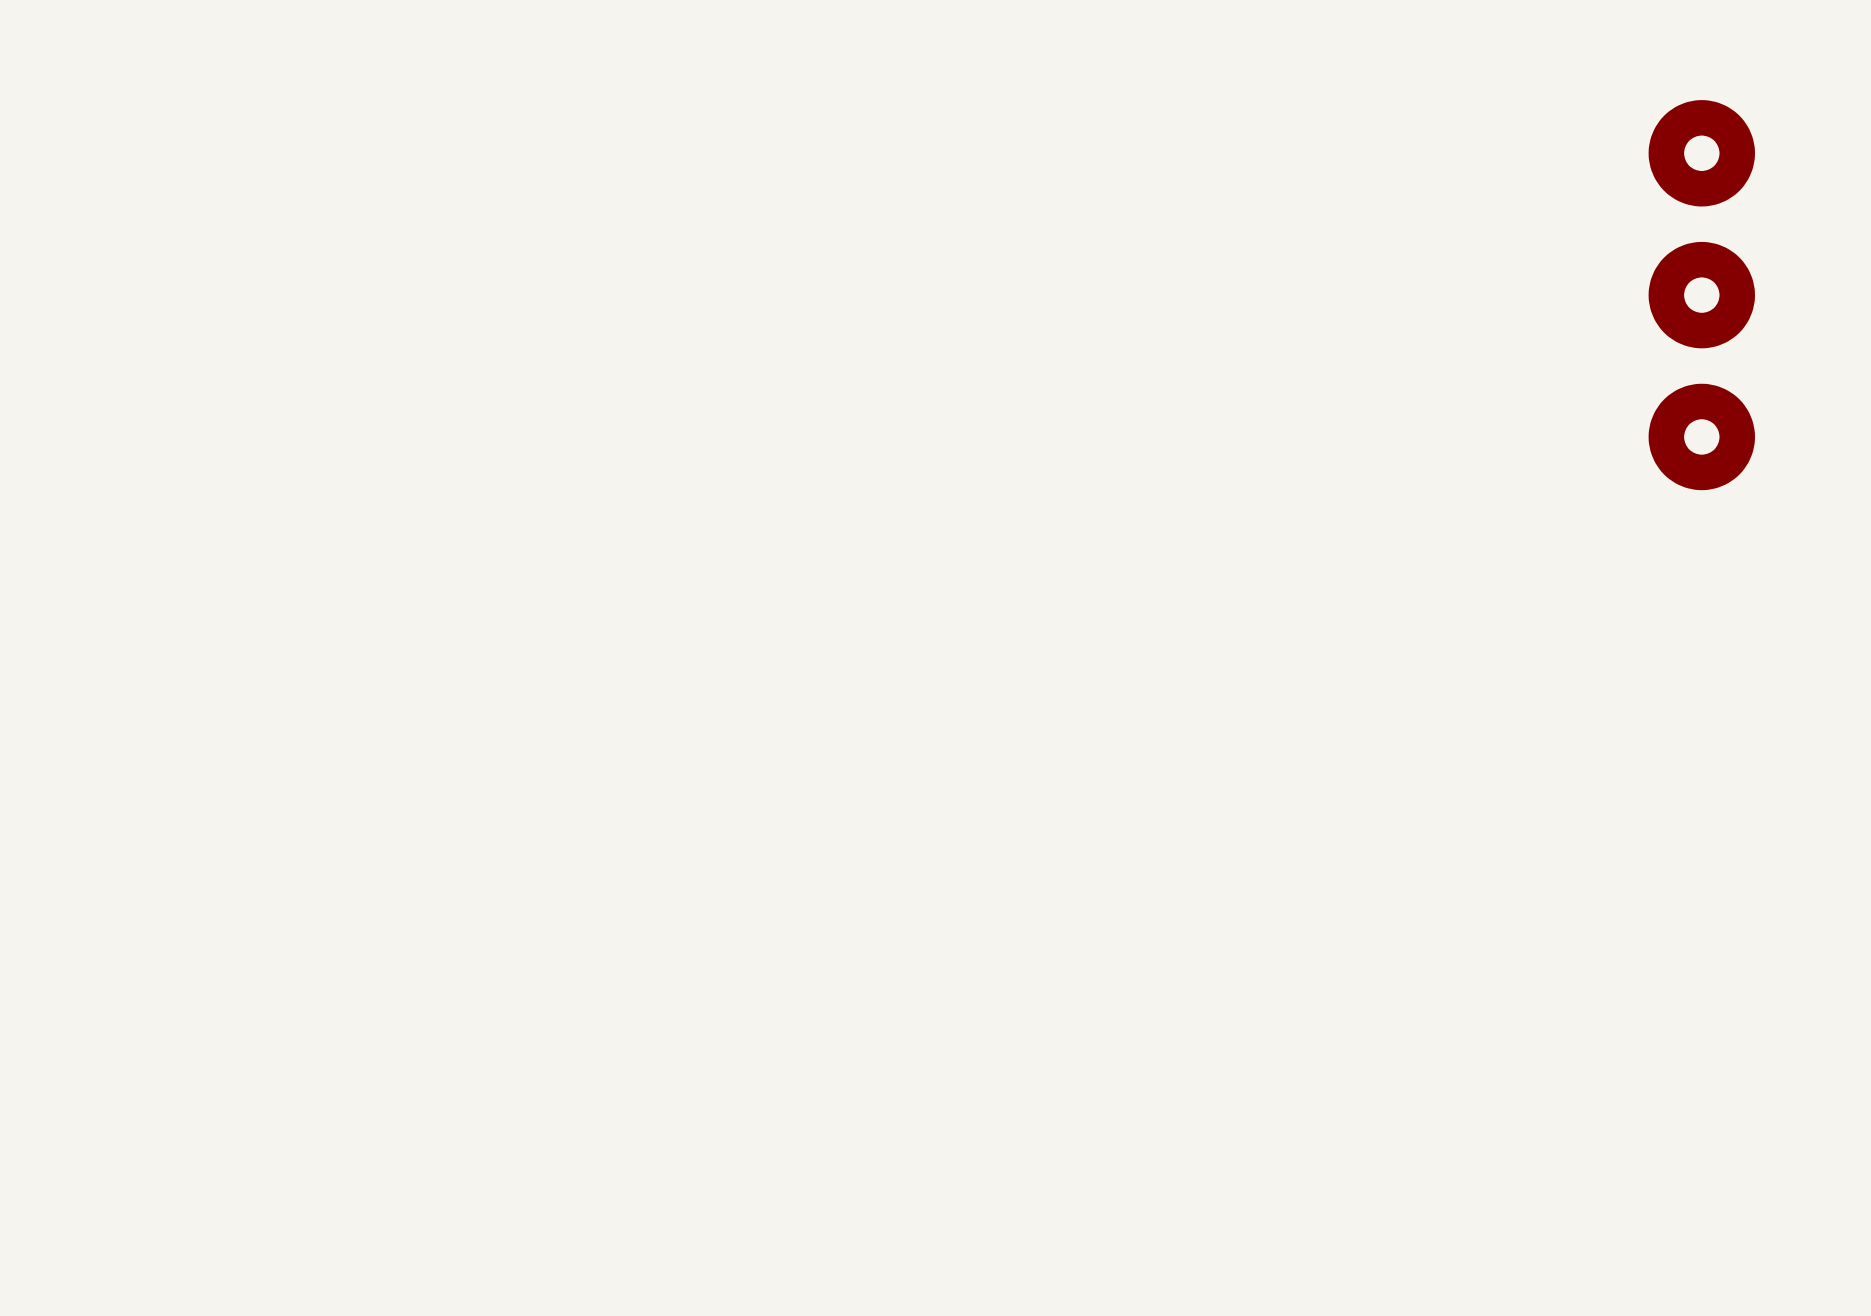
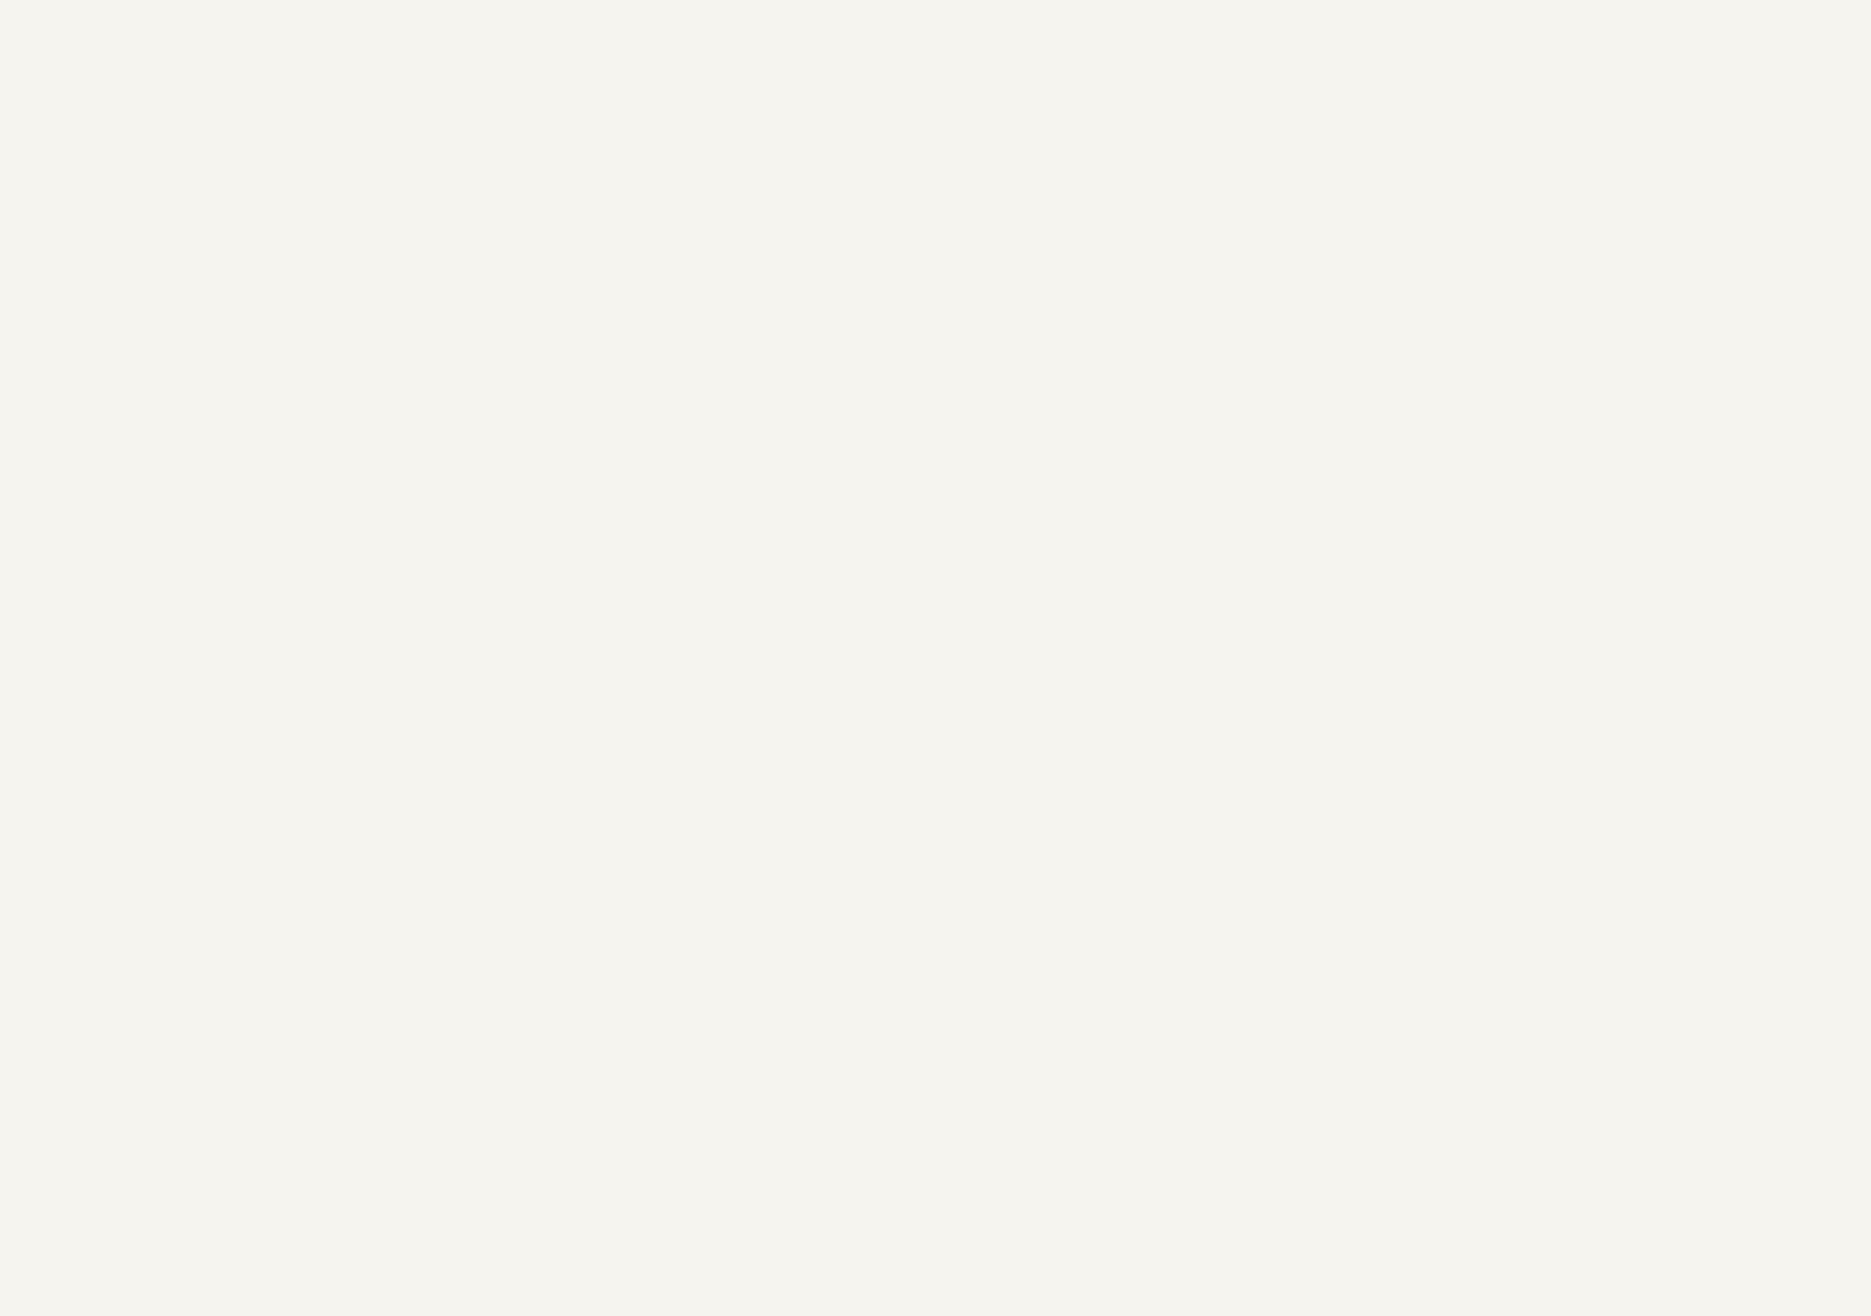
part: (1701, 153) -> none
part: (1701, 295) -> none
part: (1701, 436) -> none

